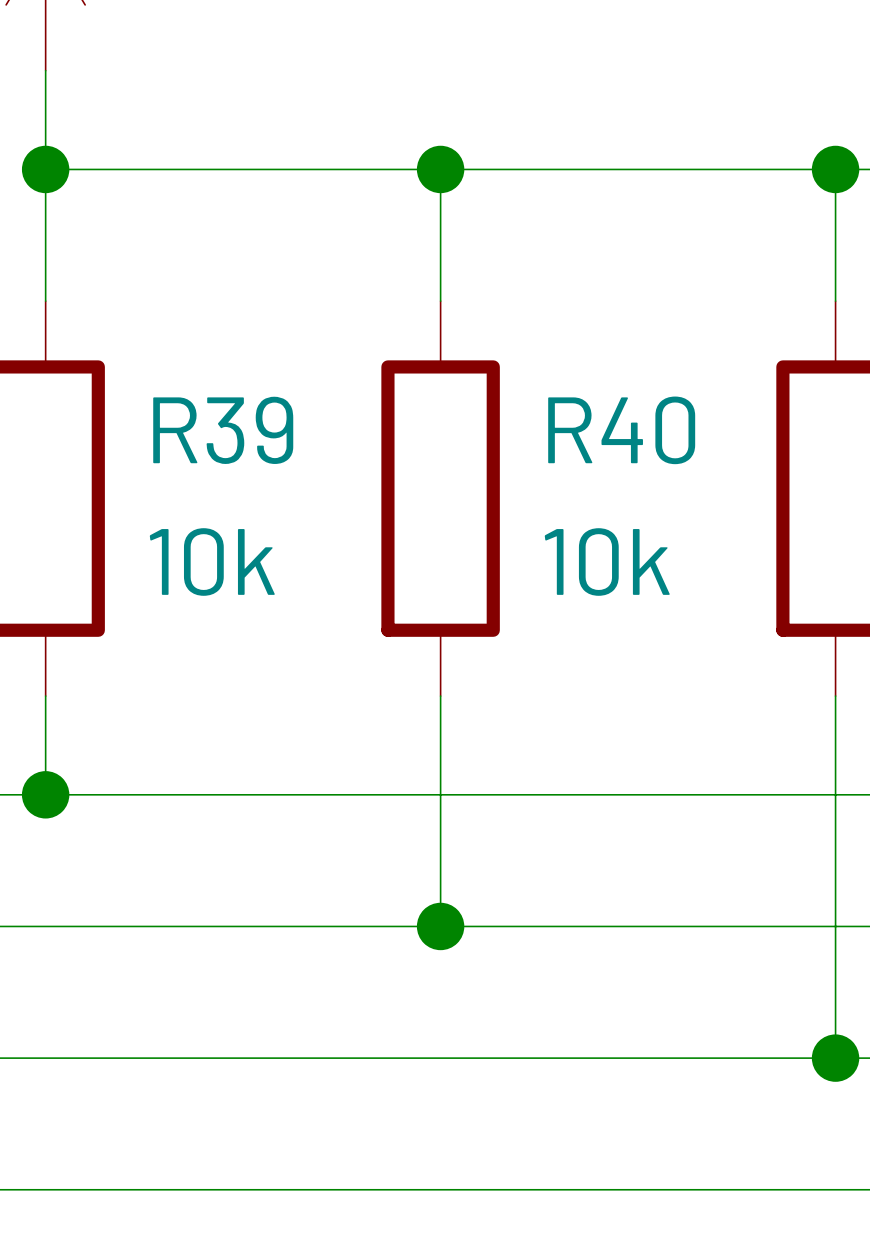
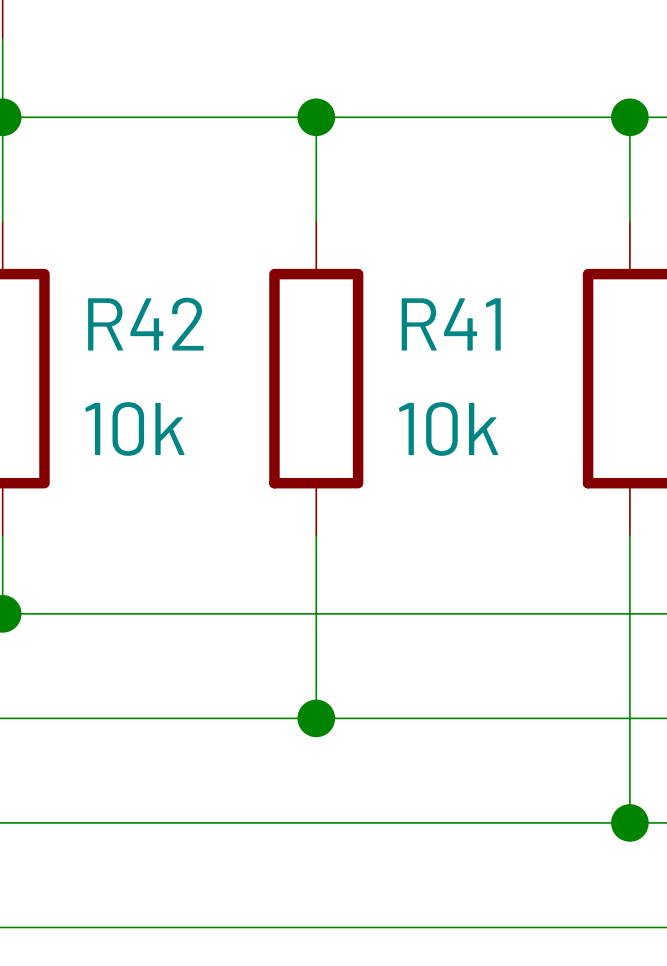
R39 name: R39 (223, 430) -> R42 (145, 324)
R40 name: R40 (621, 430) -> R41 (451, 324)

